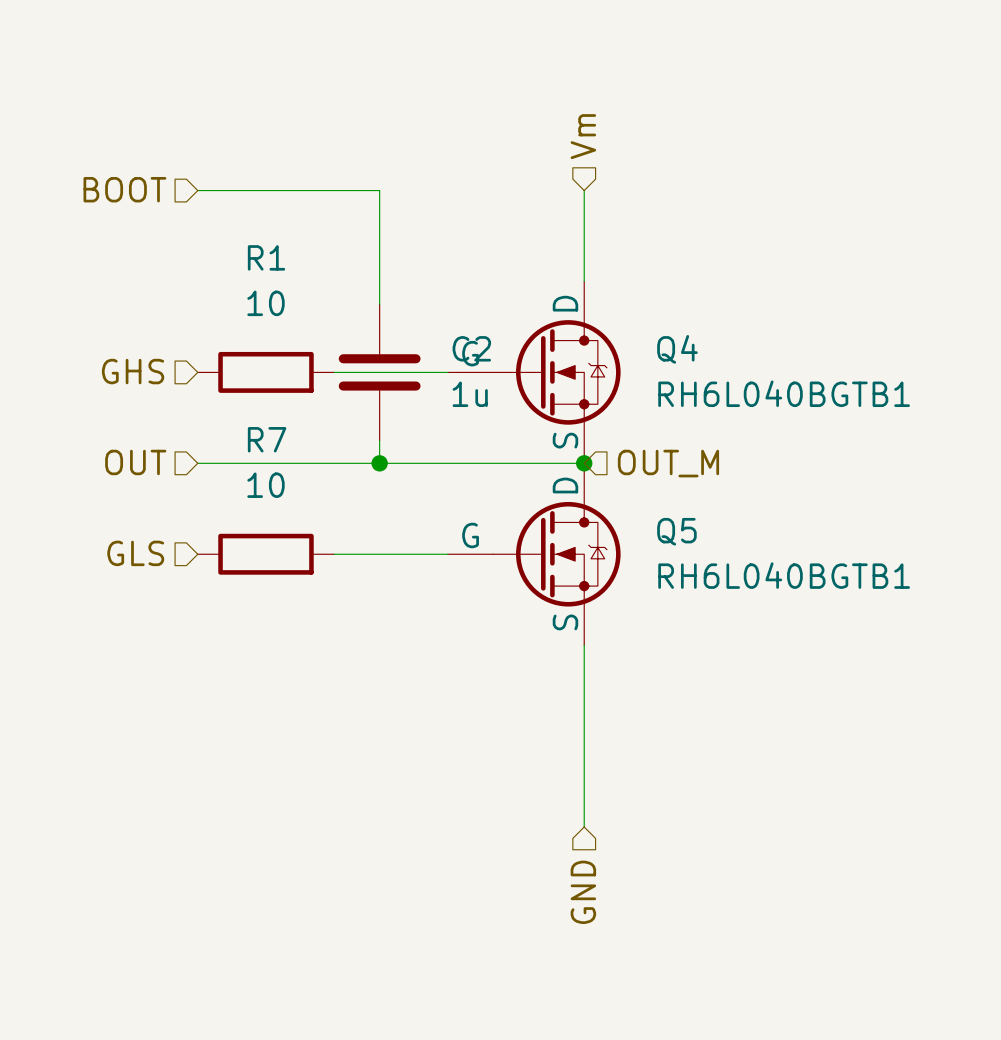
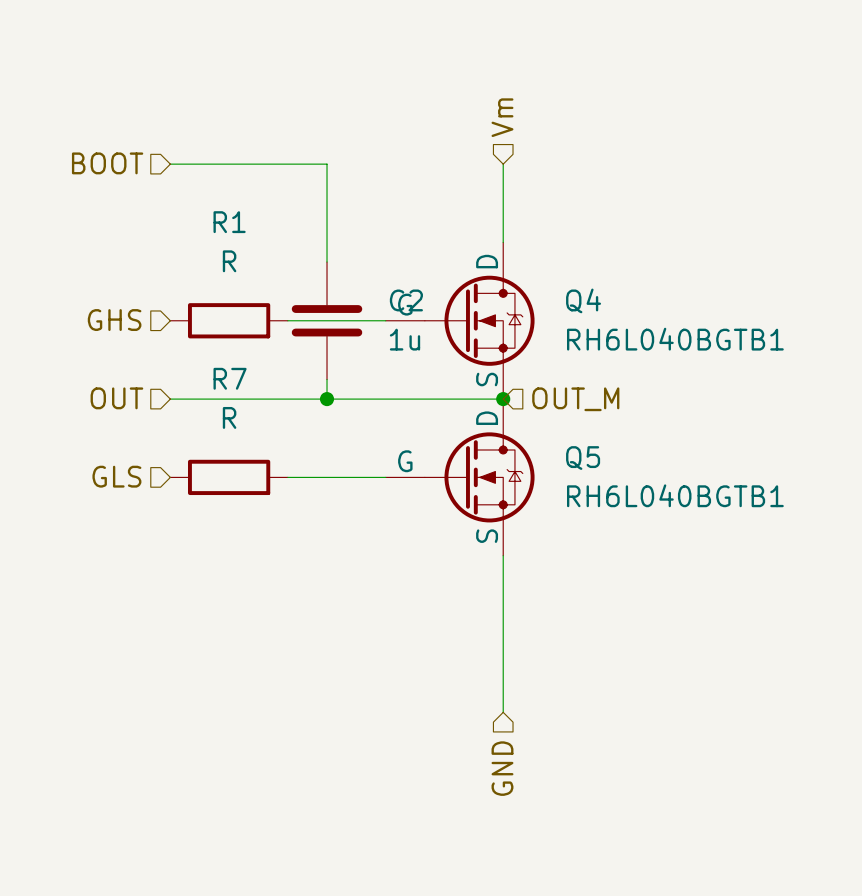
R1 value: 10 (265, 303) -> R (229, 261)
R7 value: 10 (265, 485) -> R (229, 417)

